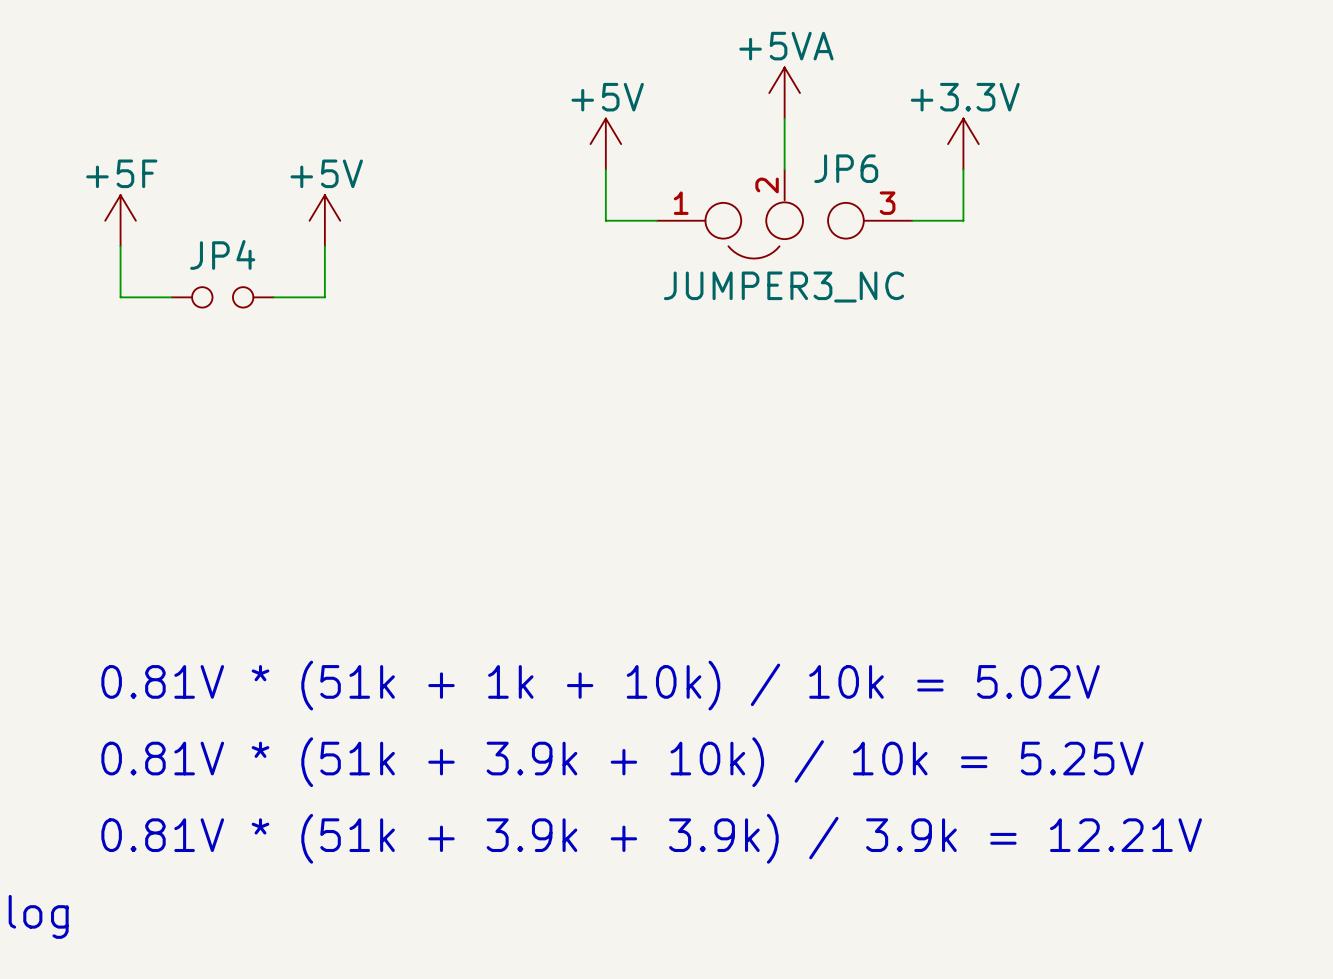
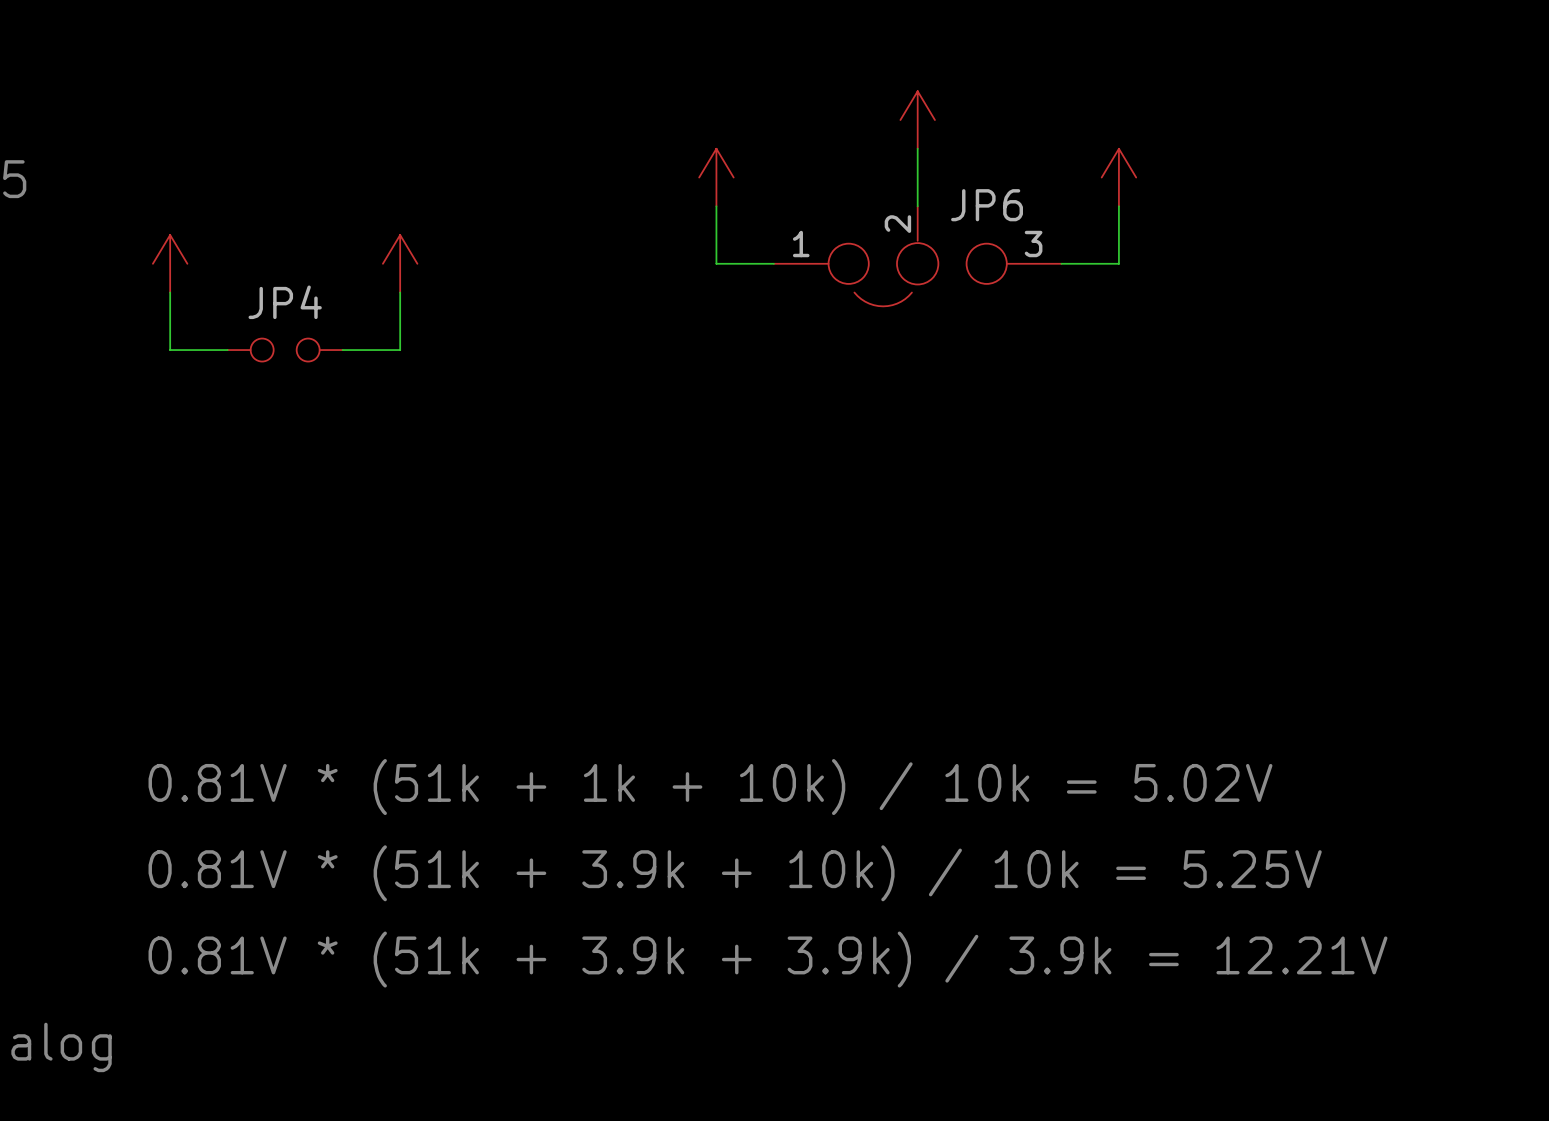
power symbol text: +5VA (786, 46) -> none
power symbol text: +5V (607, 97) -> none
power symbol text: +3.3V (965, 97) -> none
power symbol text: +5F (121, 173) -> none
power symbol text: +5V (326, 173) -> none
JP6 value: JUMPER3_NC (784, 287) -> none

